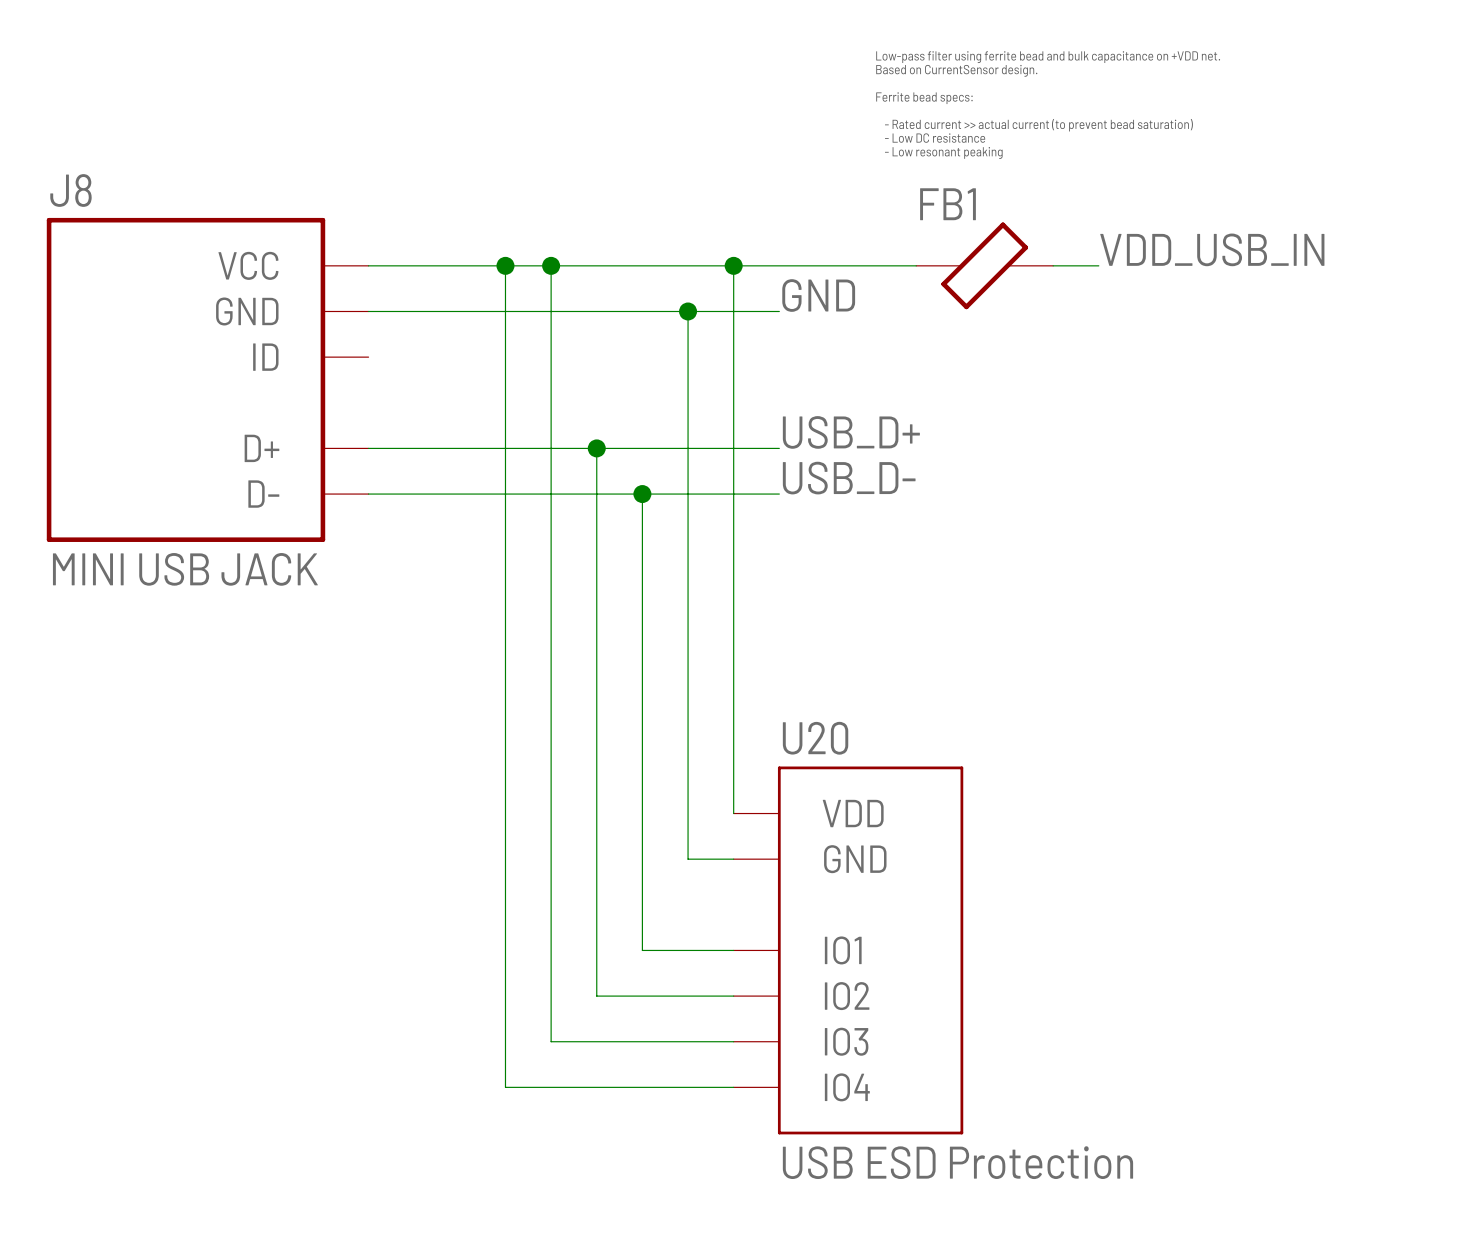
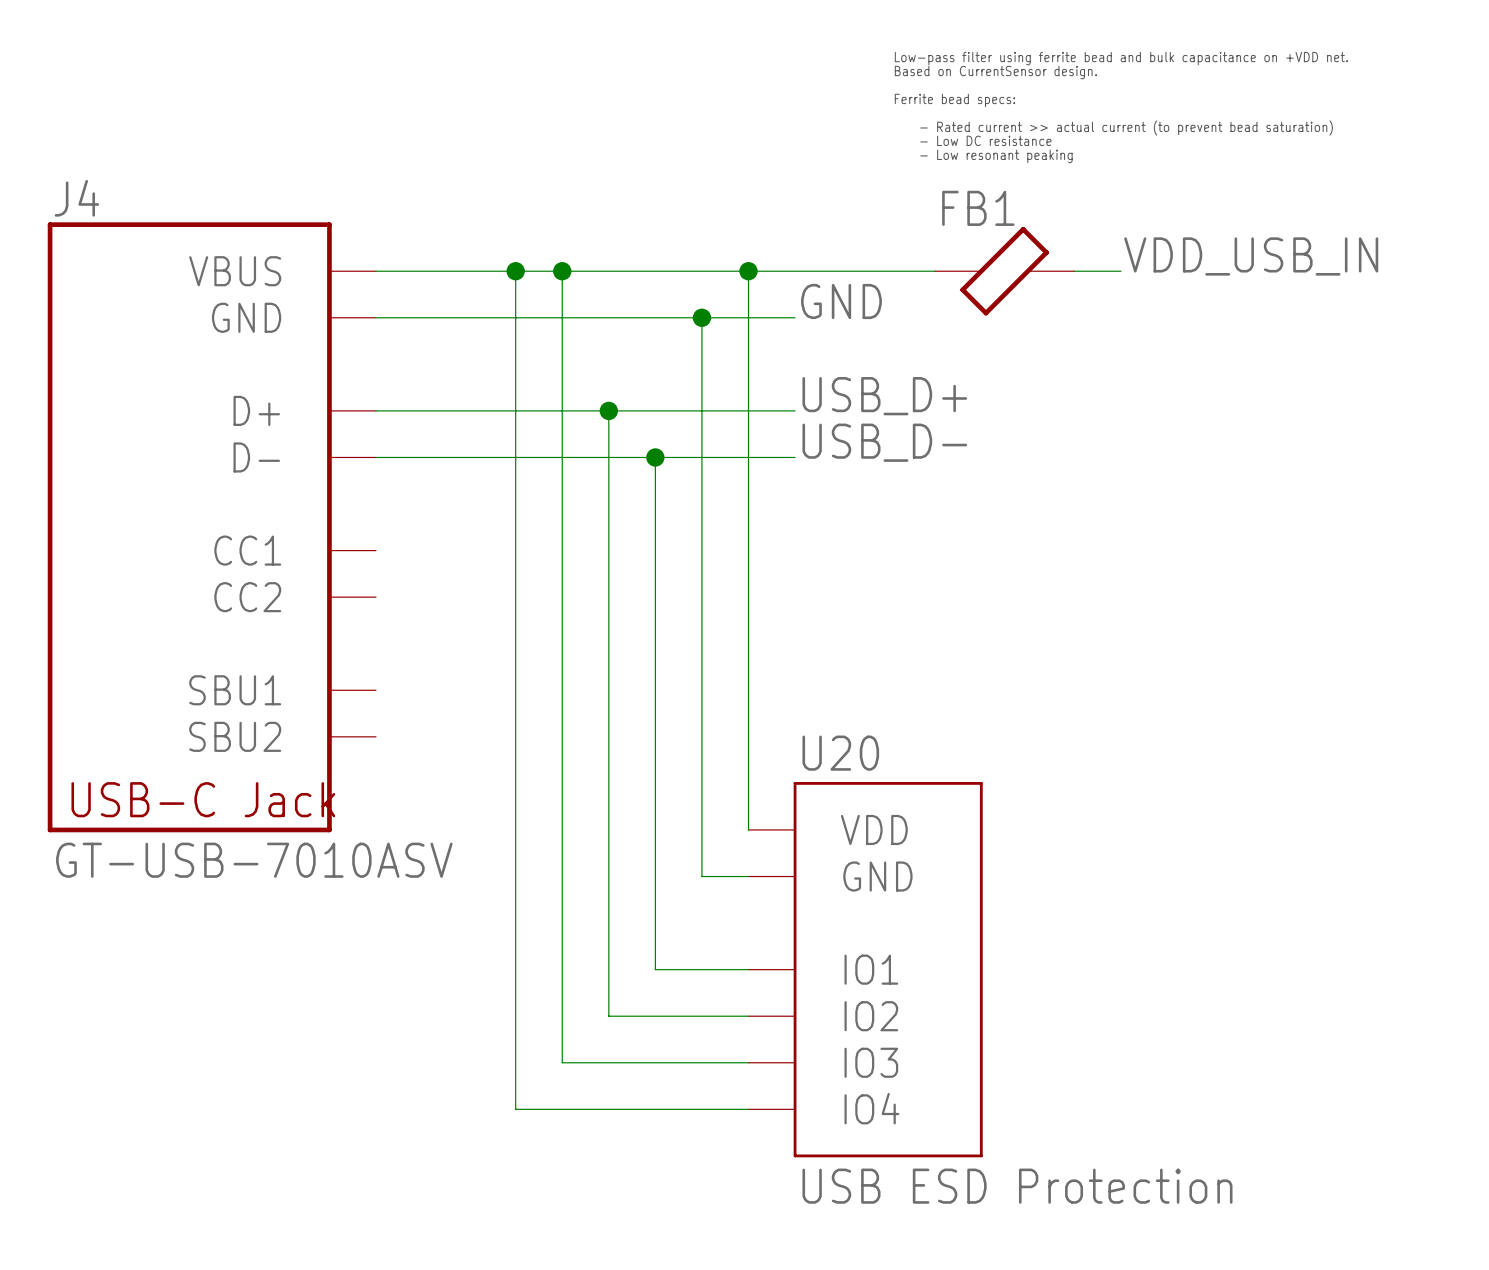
J8: (207, 379) -> none
label: none -> USB_D+ (884, 396)
wire: none -> (608, 410) (608, 457)
junction: none -> (608, 410)
label: USB_D+ (851, 432) -> USB_D- (884, 442)
junction: (596, 448) -> none
wire: none -> (655, 457) (655, 504)
junction: none -> (655, 457)
label: USB_D- (849, 478) -> none
wire: (368, 494) (779, 494) -> (376, 410) (795, 410)
junction: (642, 494) -> none
J4: none -> (211, 527)

